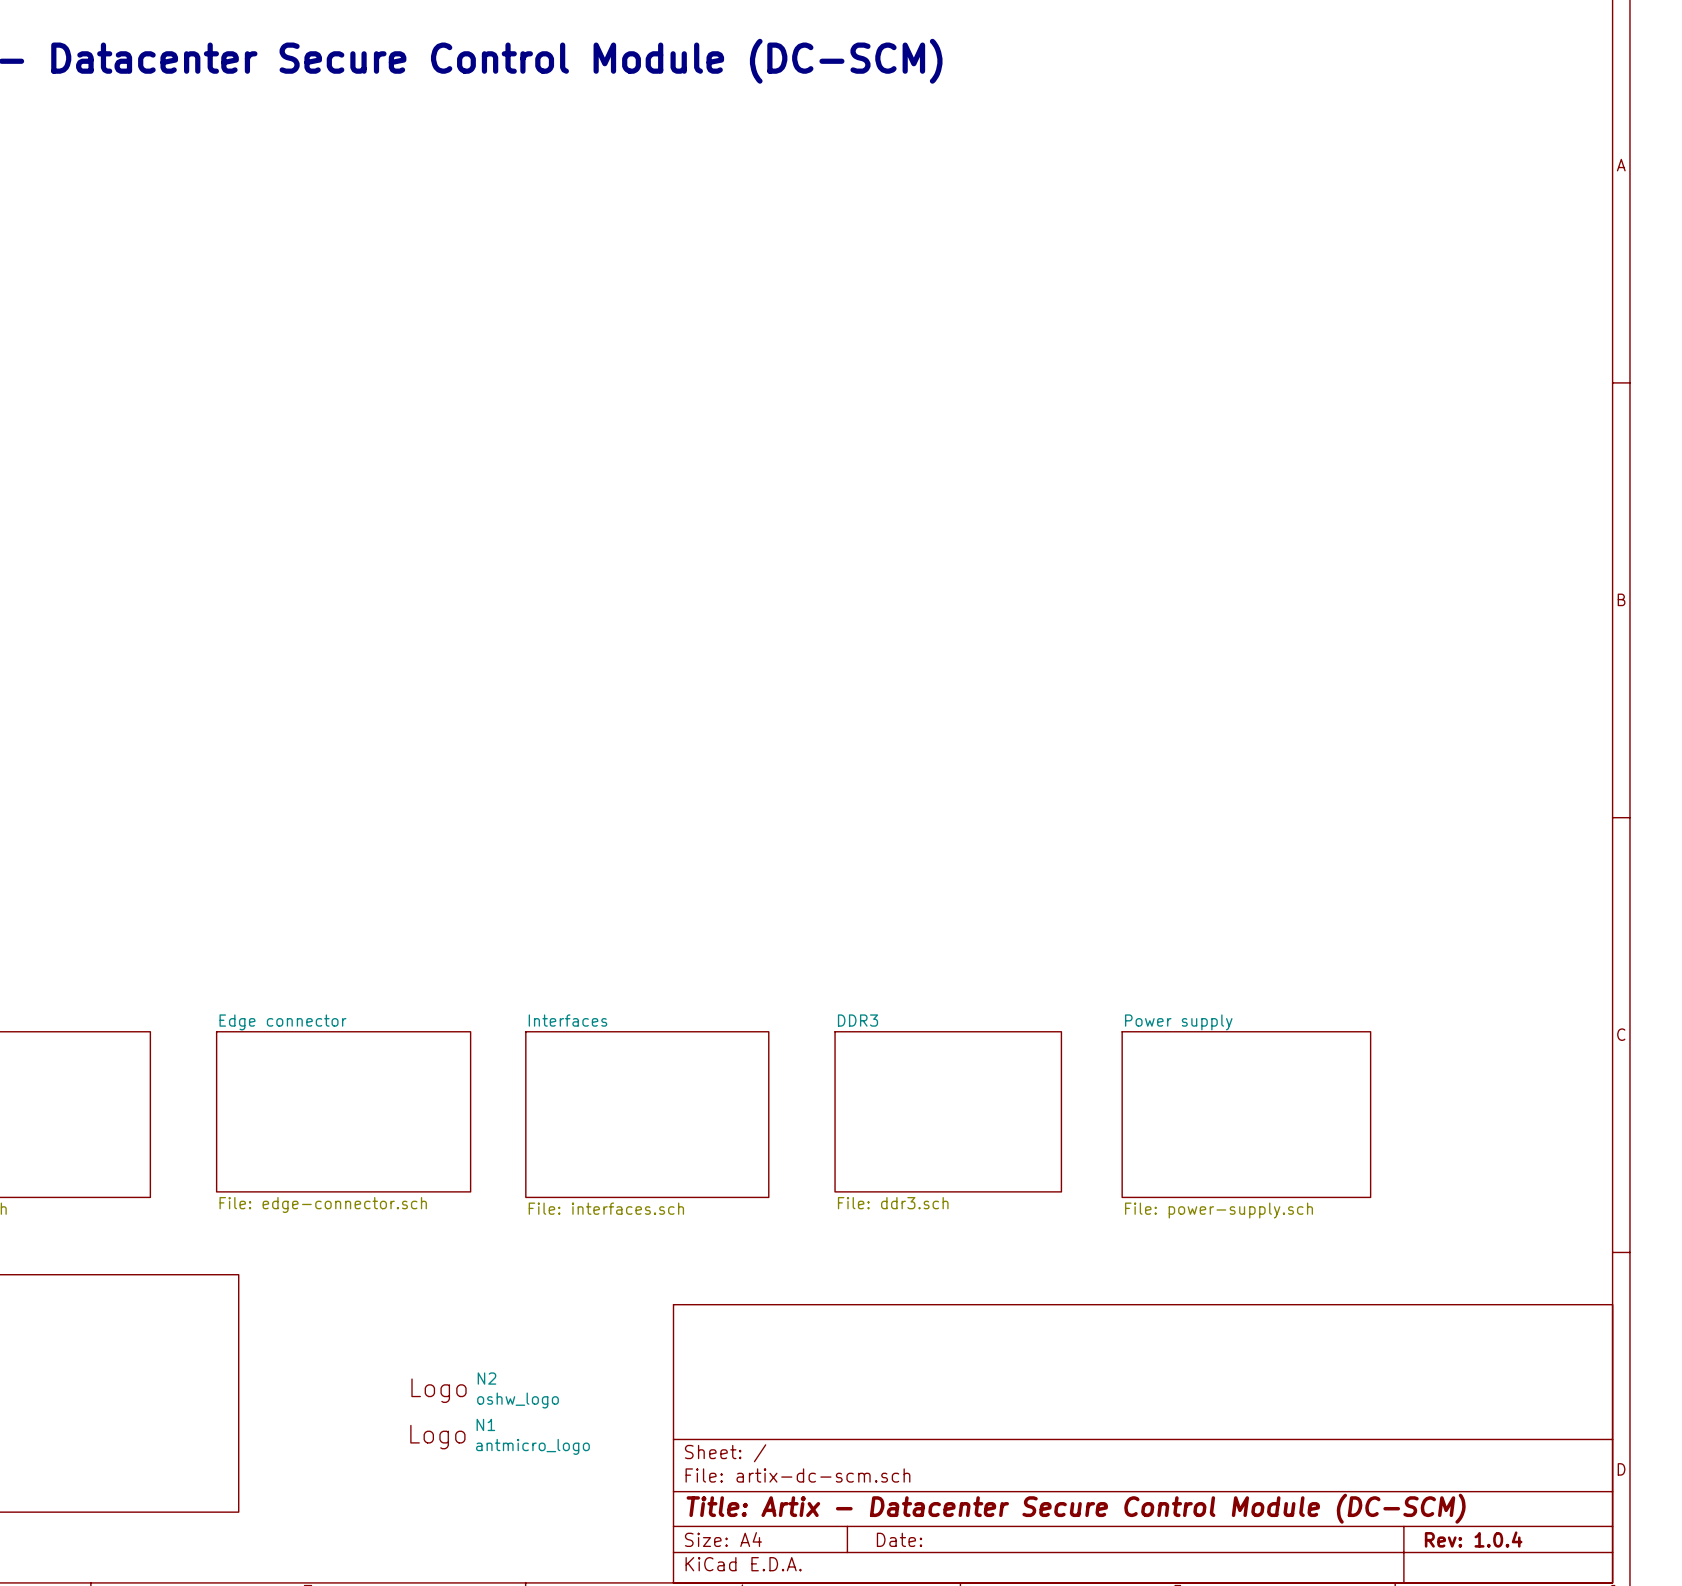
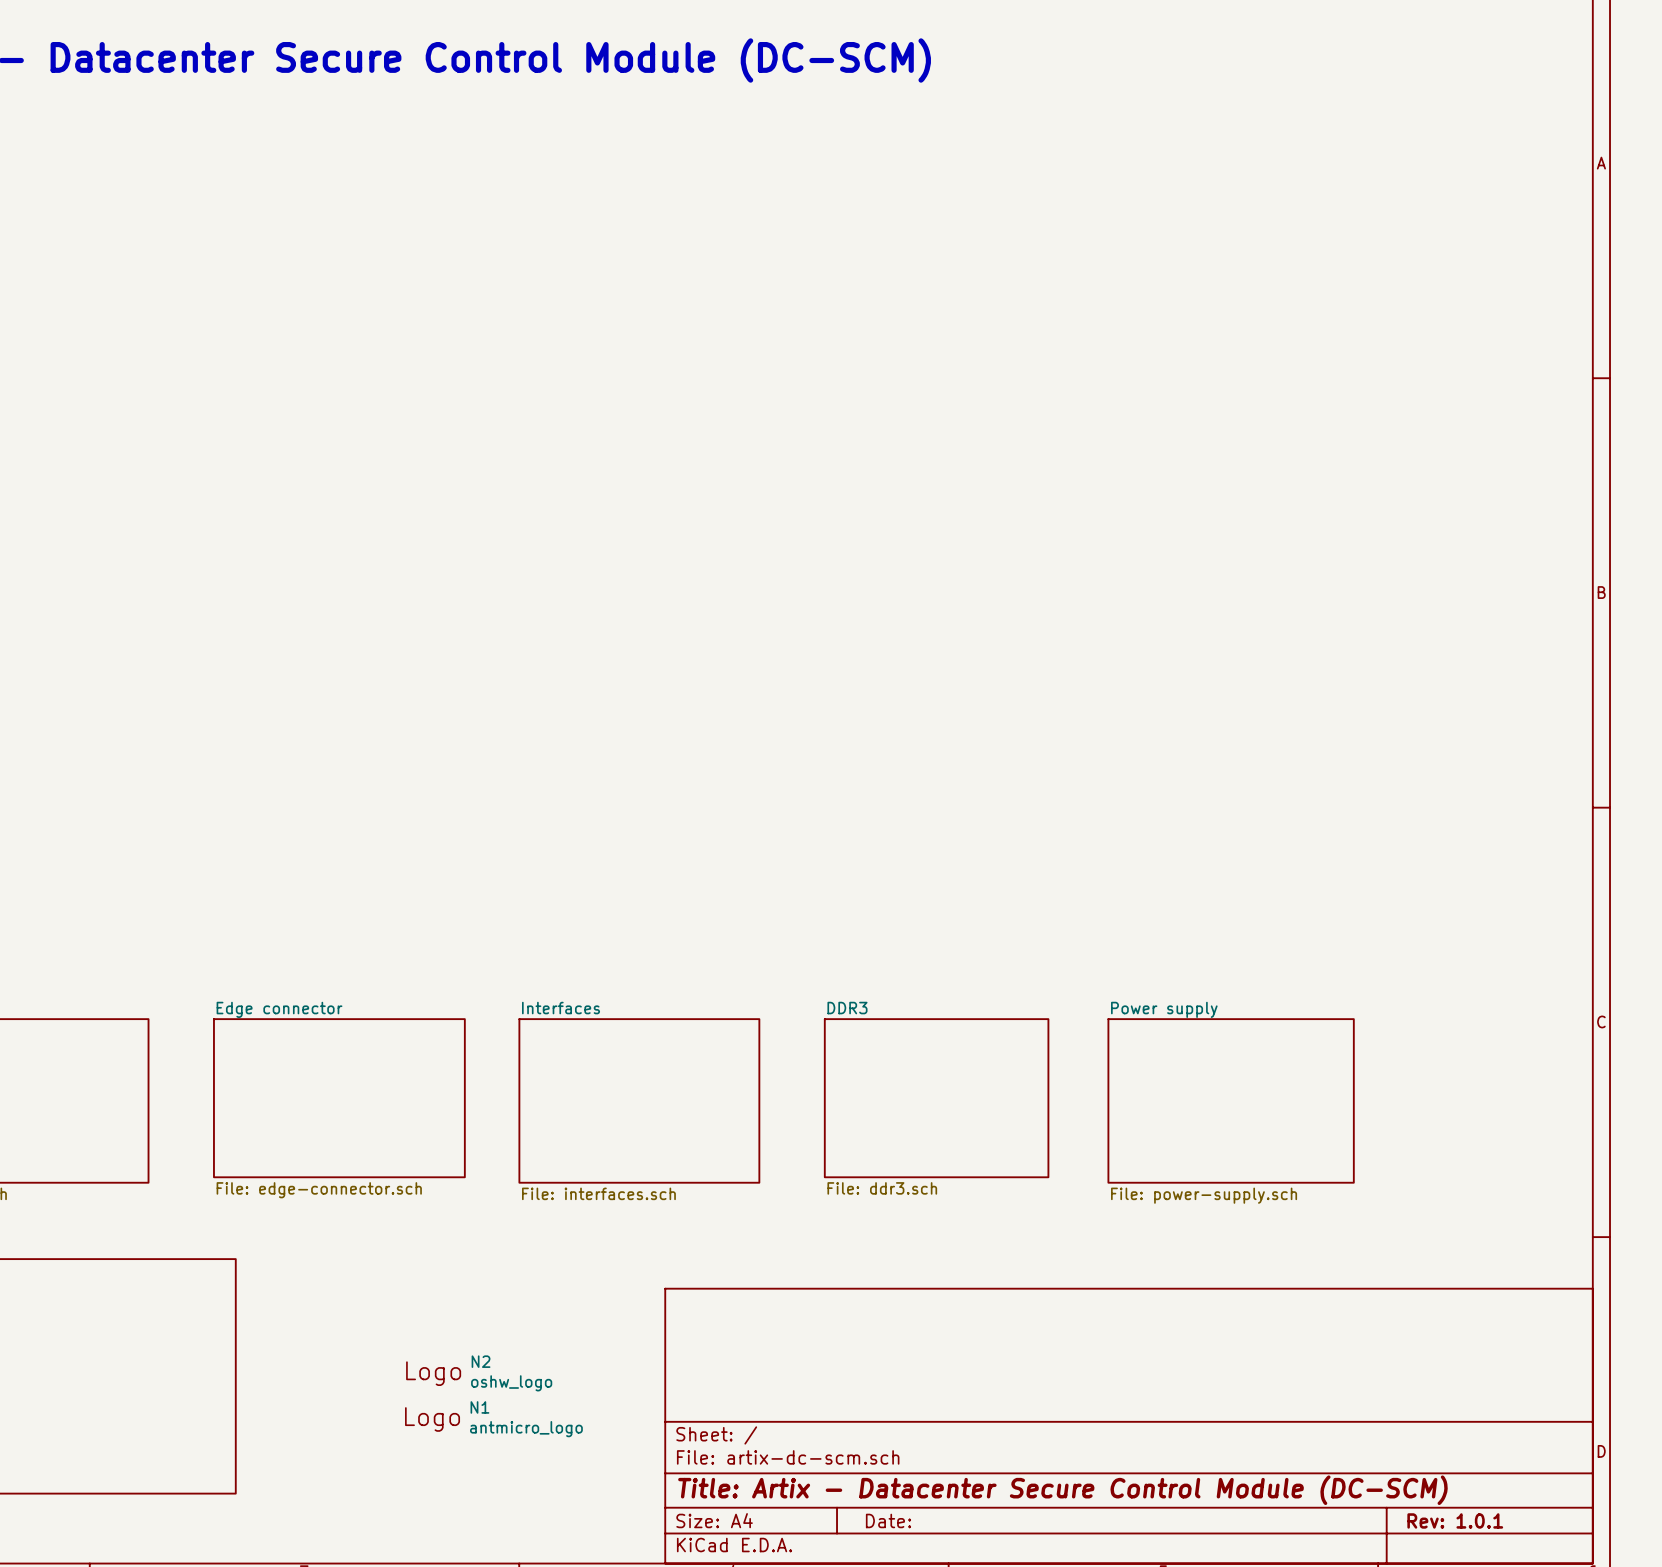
title block: Rev: 1.0.4 (1473, 1539) -> Rev: 1.0.1 (1455, 1520)

